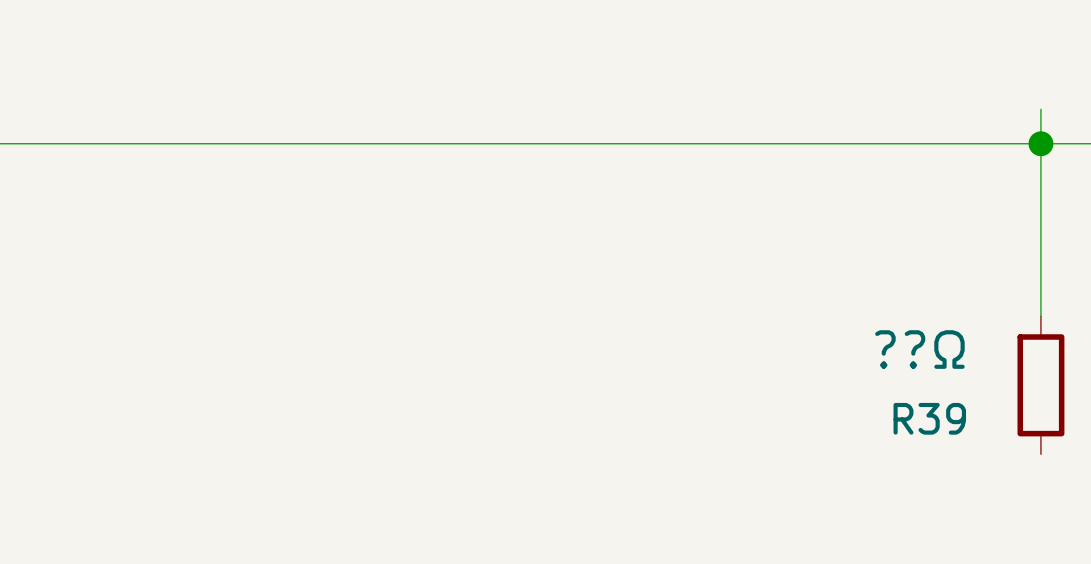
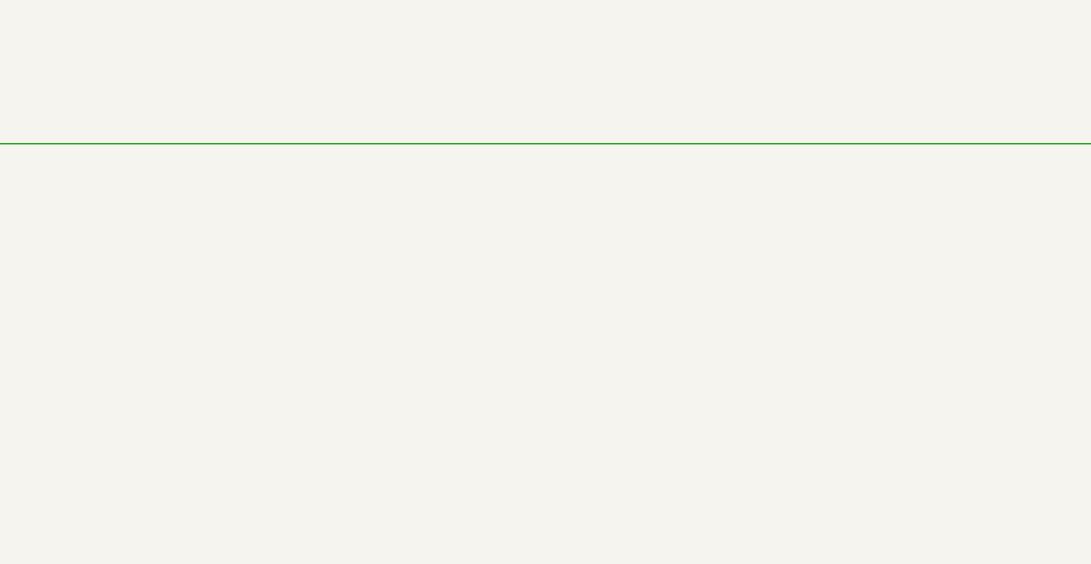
wire: (1040, 109) (1040, 316) -> none
junction: (1040, 143) -> none
R39: ??Ω (1040, 385) -> none

